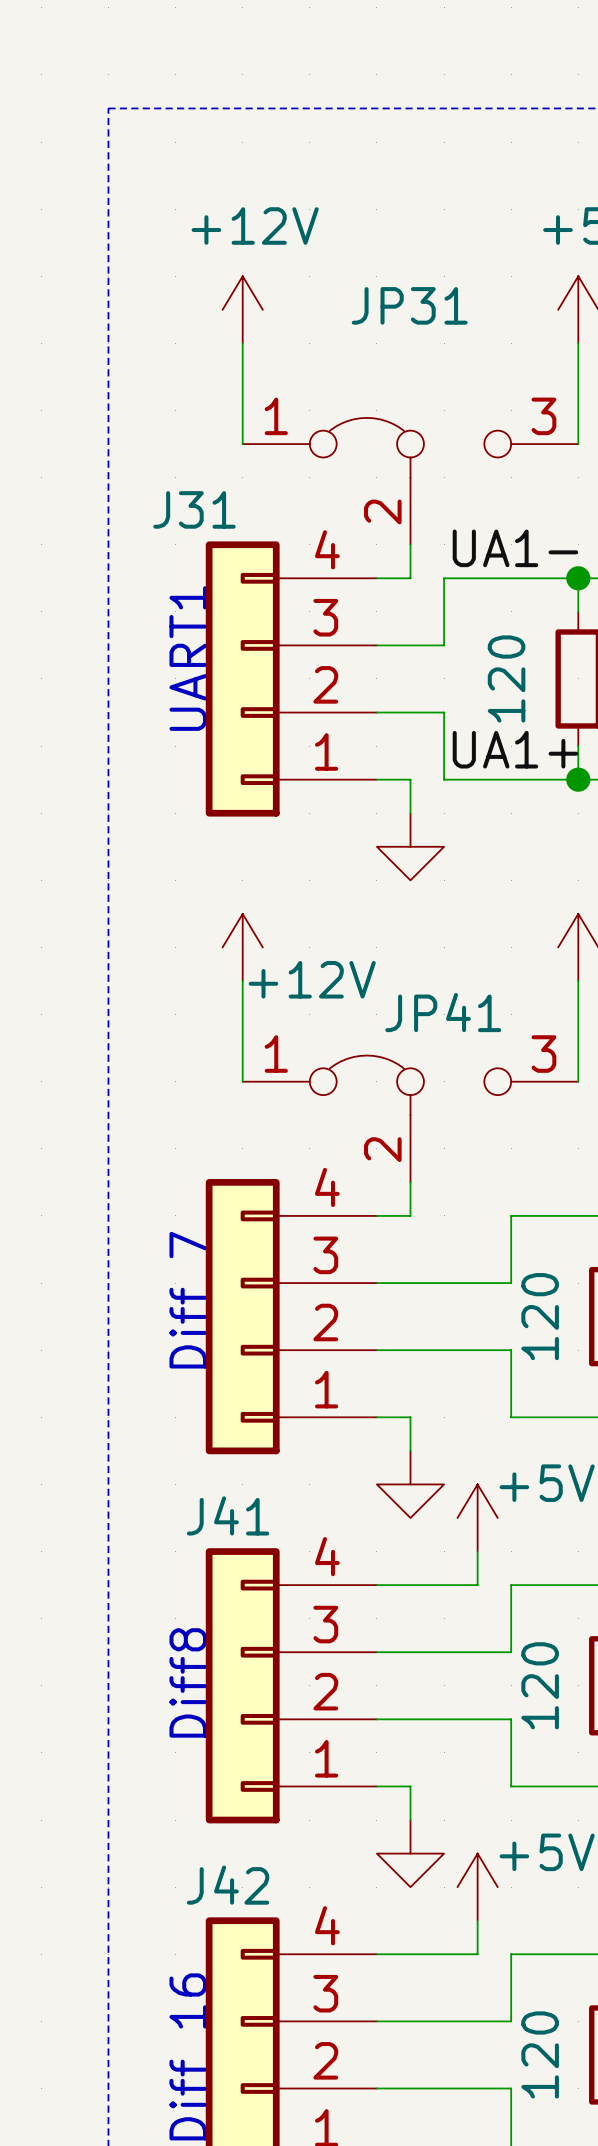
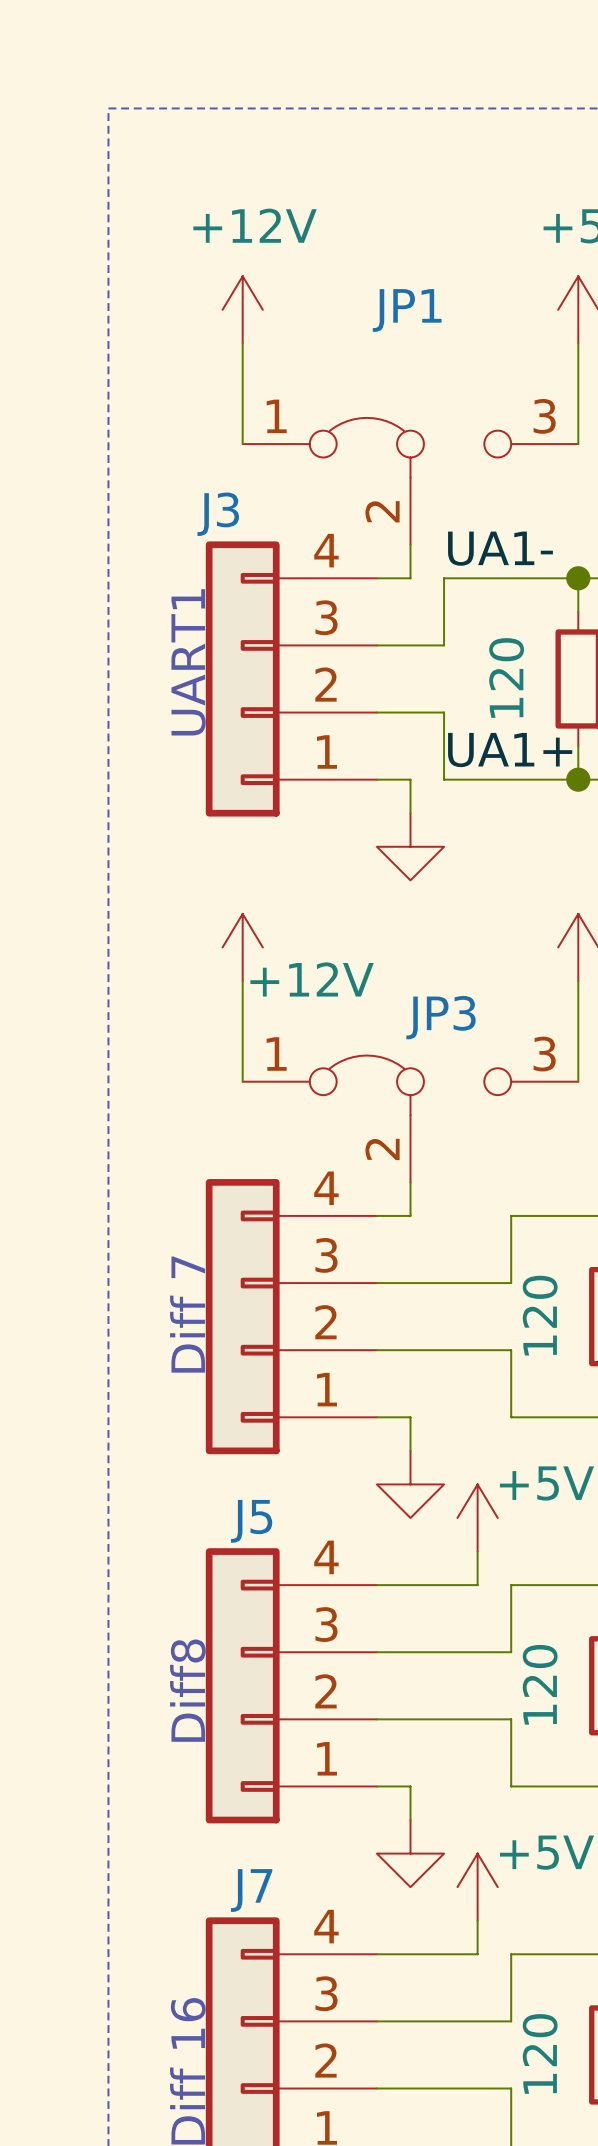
JP31 name: JP31 (409, 305) -> JP1 (407, 310)
J31 name: J31 (194, 509) -> J3 (218, 514)
JP41 name: JP41 (443, 1012) -> JP3 (441, 1017)
J41 name: J41 (228, 1515) -> J5 (251, 1521)
J42 name: J42 (228, 1885) -> J7 (251, 1890)

